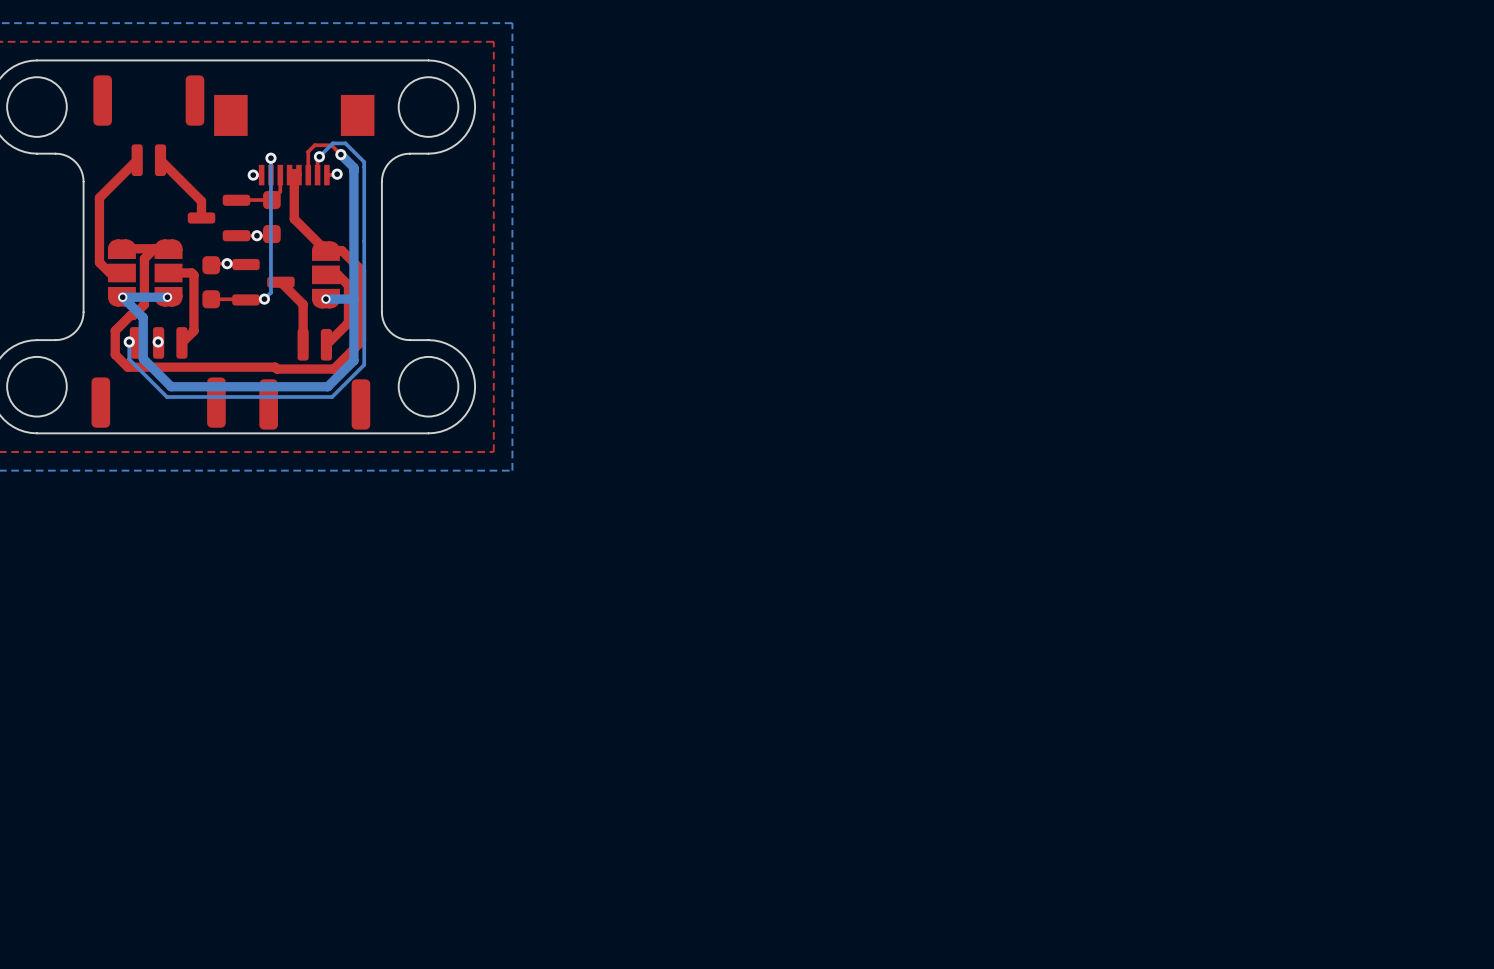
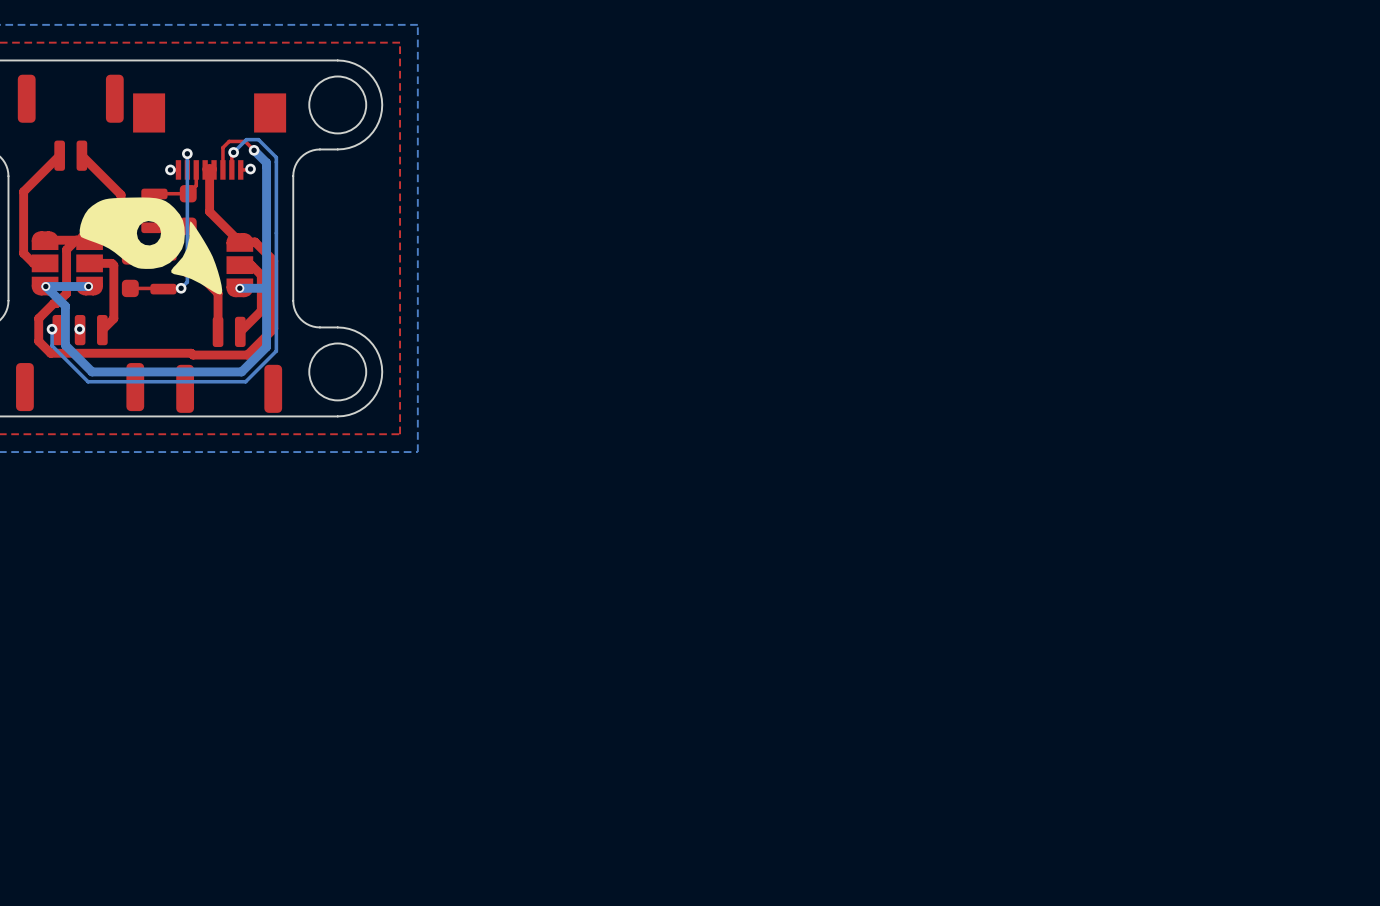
drawing: none -> [79, 197, 223, 295]

